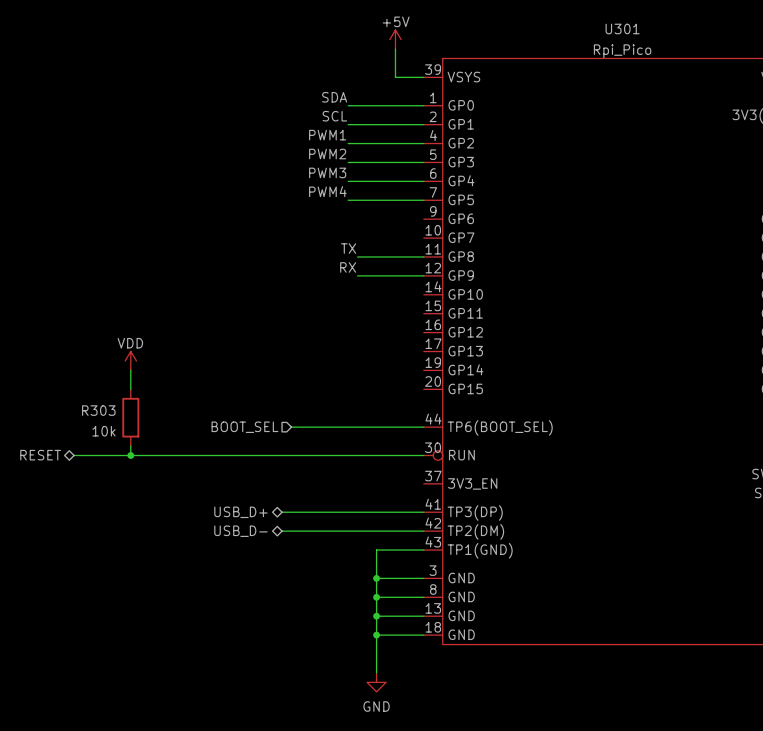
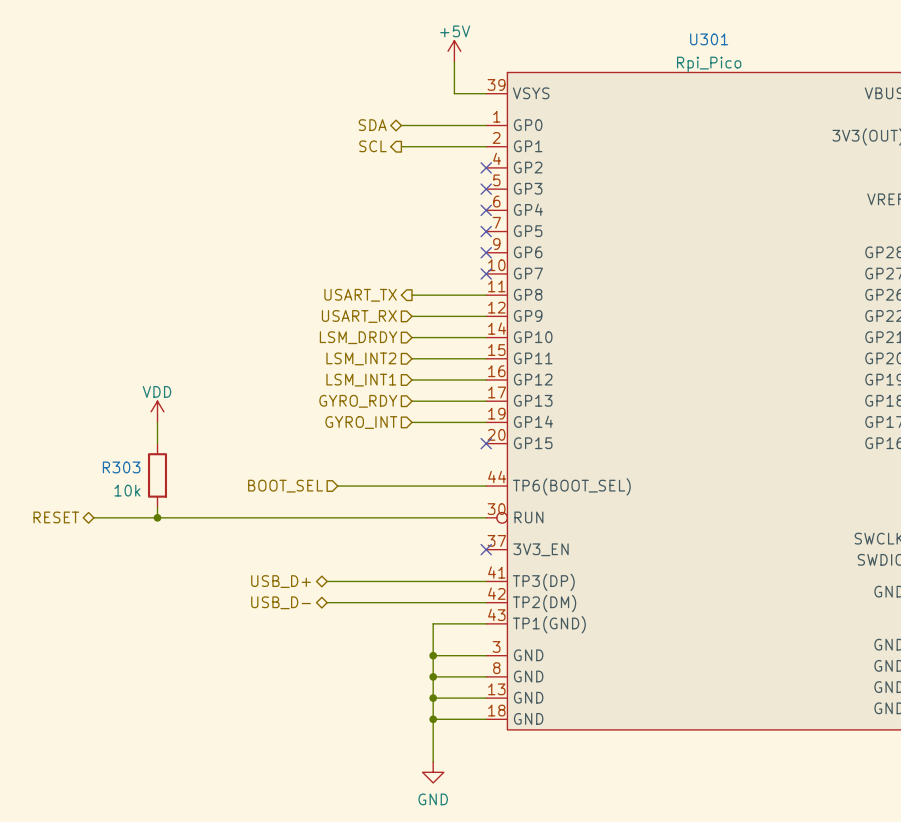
label: SDA (334, 97) -> none
hierarchical label: none -> SDA (372, 125)
label: SCL (334, 116) -> none
hierarchical label: none -> SCL (372, 146)
label: PWM1 (327, 135) -> none
wire: (348, 143) (423, 143) -> none
no-connect mark: none -> (486, 167)
label: PWM2 (327, 154) -> none
wire: (348, 162) (423, 162) -> none
no-connect mark: none -> (486, 189)
label: PWM3 (327, 172) -> none
wire: (348, 181) (423, 181) -> none
no-connect mark: none -> (486, 210)
label: PWM4 (327, 191) -> none
wire: (348, 200) (423, 200) -> none
no-connect mark: none -> (486, 231)
no-connect mark: none -> (486, 252)
no-connect mark: none -> (486, 273)
label: TX (348, 248) -> none
hierarchical label: none -> USART_TX (360, 295)
label: RX (348, 267) -> none
hierarchical label: none -> USART_RX (359, 316)
hierarchical label: none -> LSM_DRDY (358, 337)
wire: none -> (411, 337) (486, 337)
hierarchical label: none -> LSM_INT2 (361, 358)
wire: none -> (411, 358) (486, 358)
hierarchical label: none -> LSM_INT1 (361, 380)
wire: none -> (411, 379) (486, 379)
hierarchical label: none -> GYRO_RDY (358, 401)
wire: none -> (411, 401) (486, 401)
hierarchical label: none -> GYRO_INT (361, 422)
wire: none -> (411, 422) (486, 422)
no-connect mark: none -> (486, 443)
no-connect mark: none -> (486, 549)

